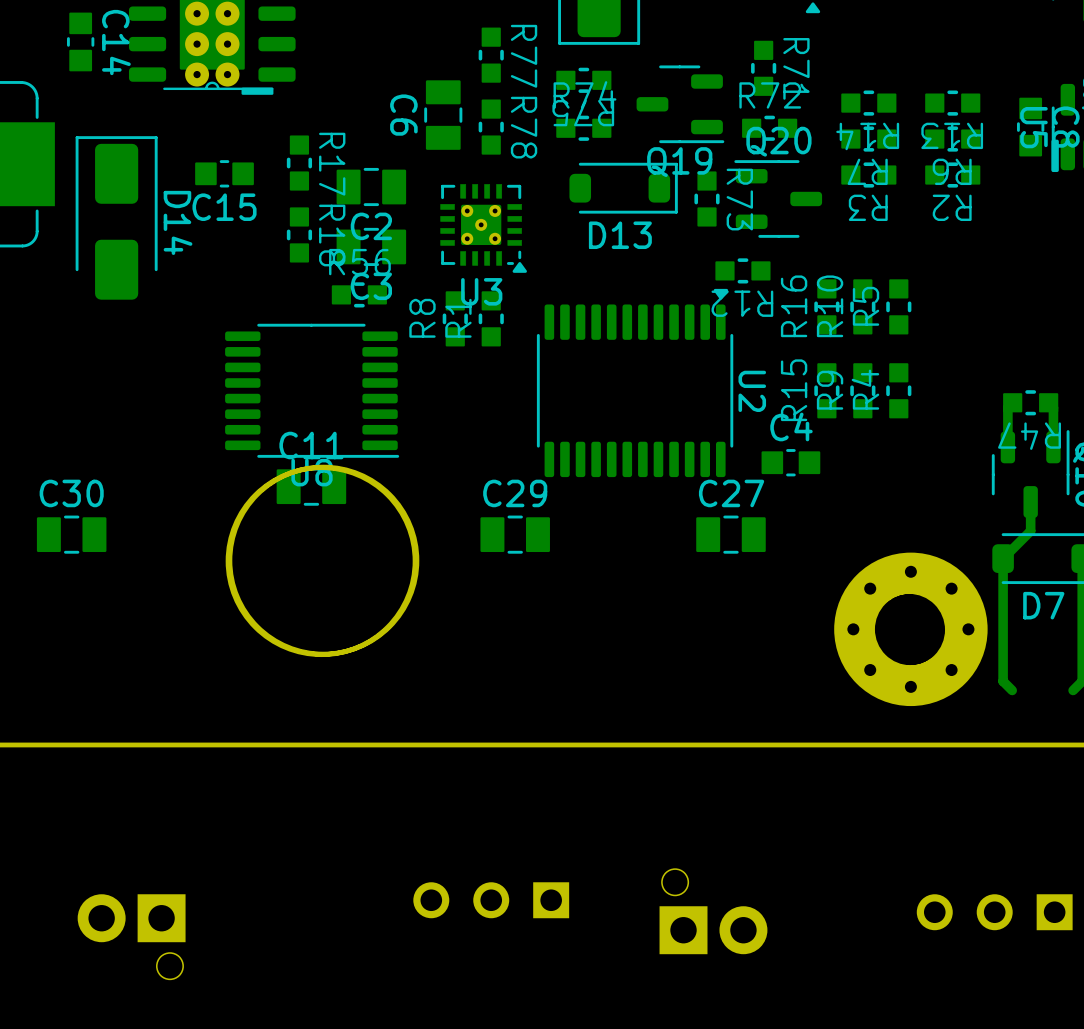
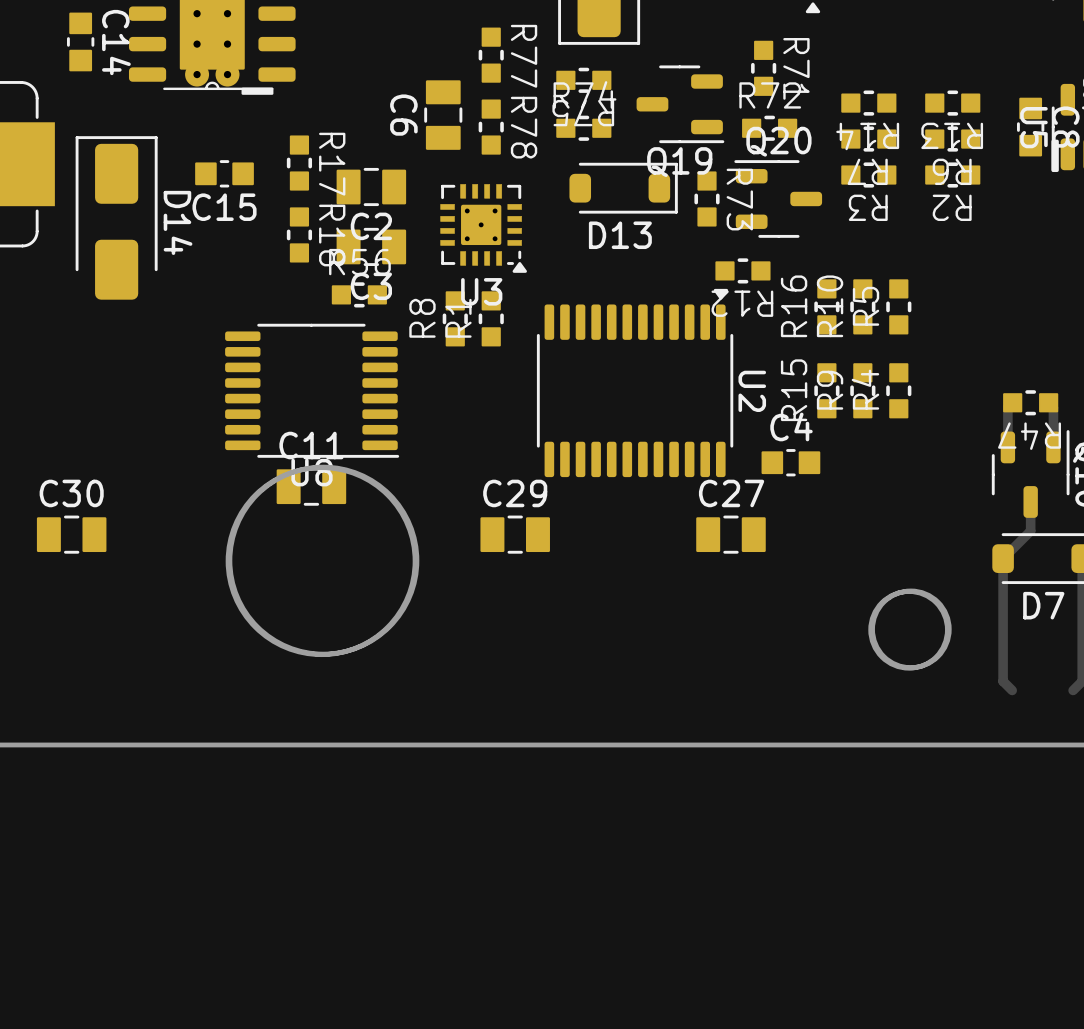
part: (910, 629) -> none
part: (491, 900) -> none
part: (713, 911) -> none
part: (994, 912) -> none
part: (131, 936) -> none

